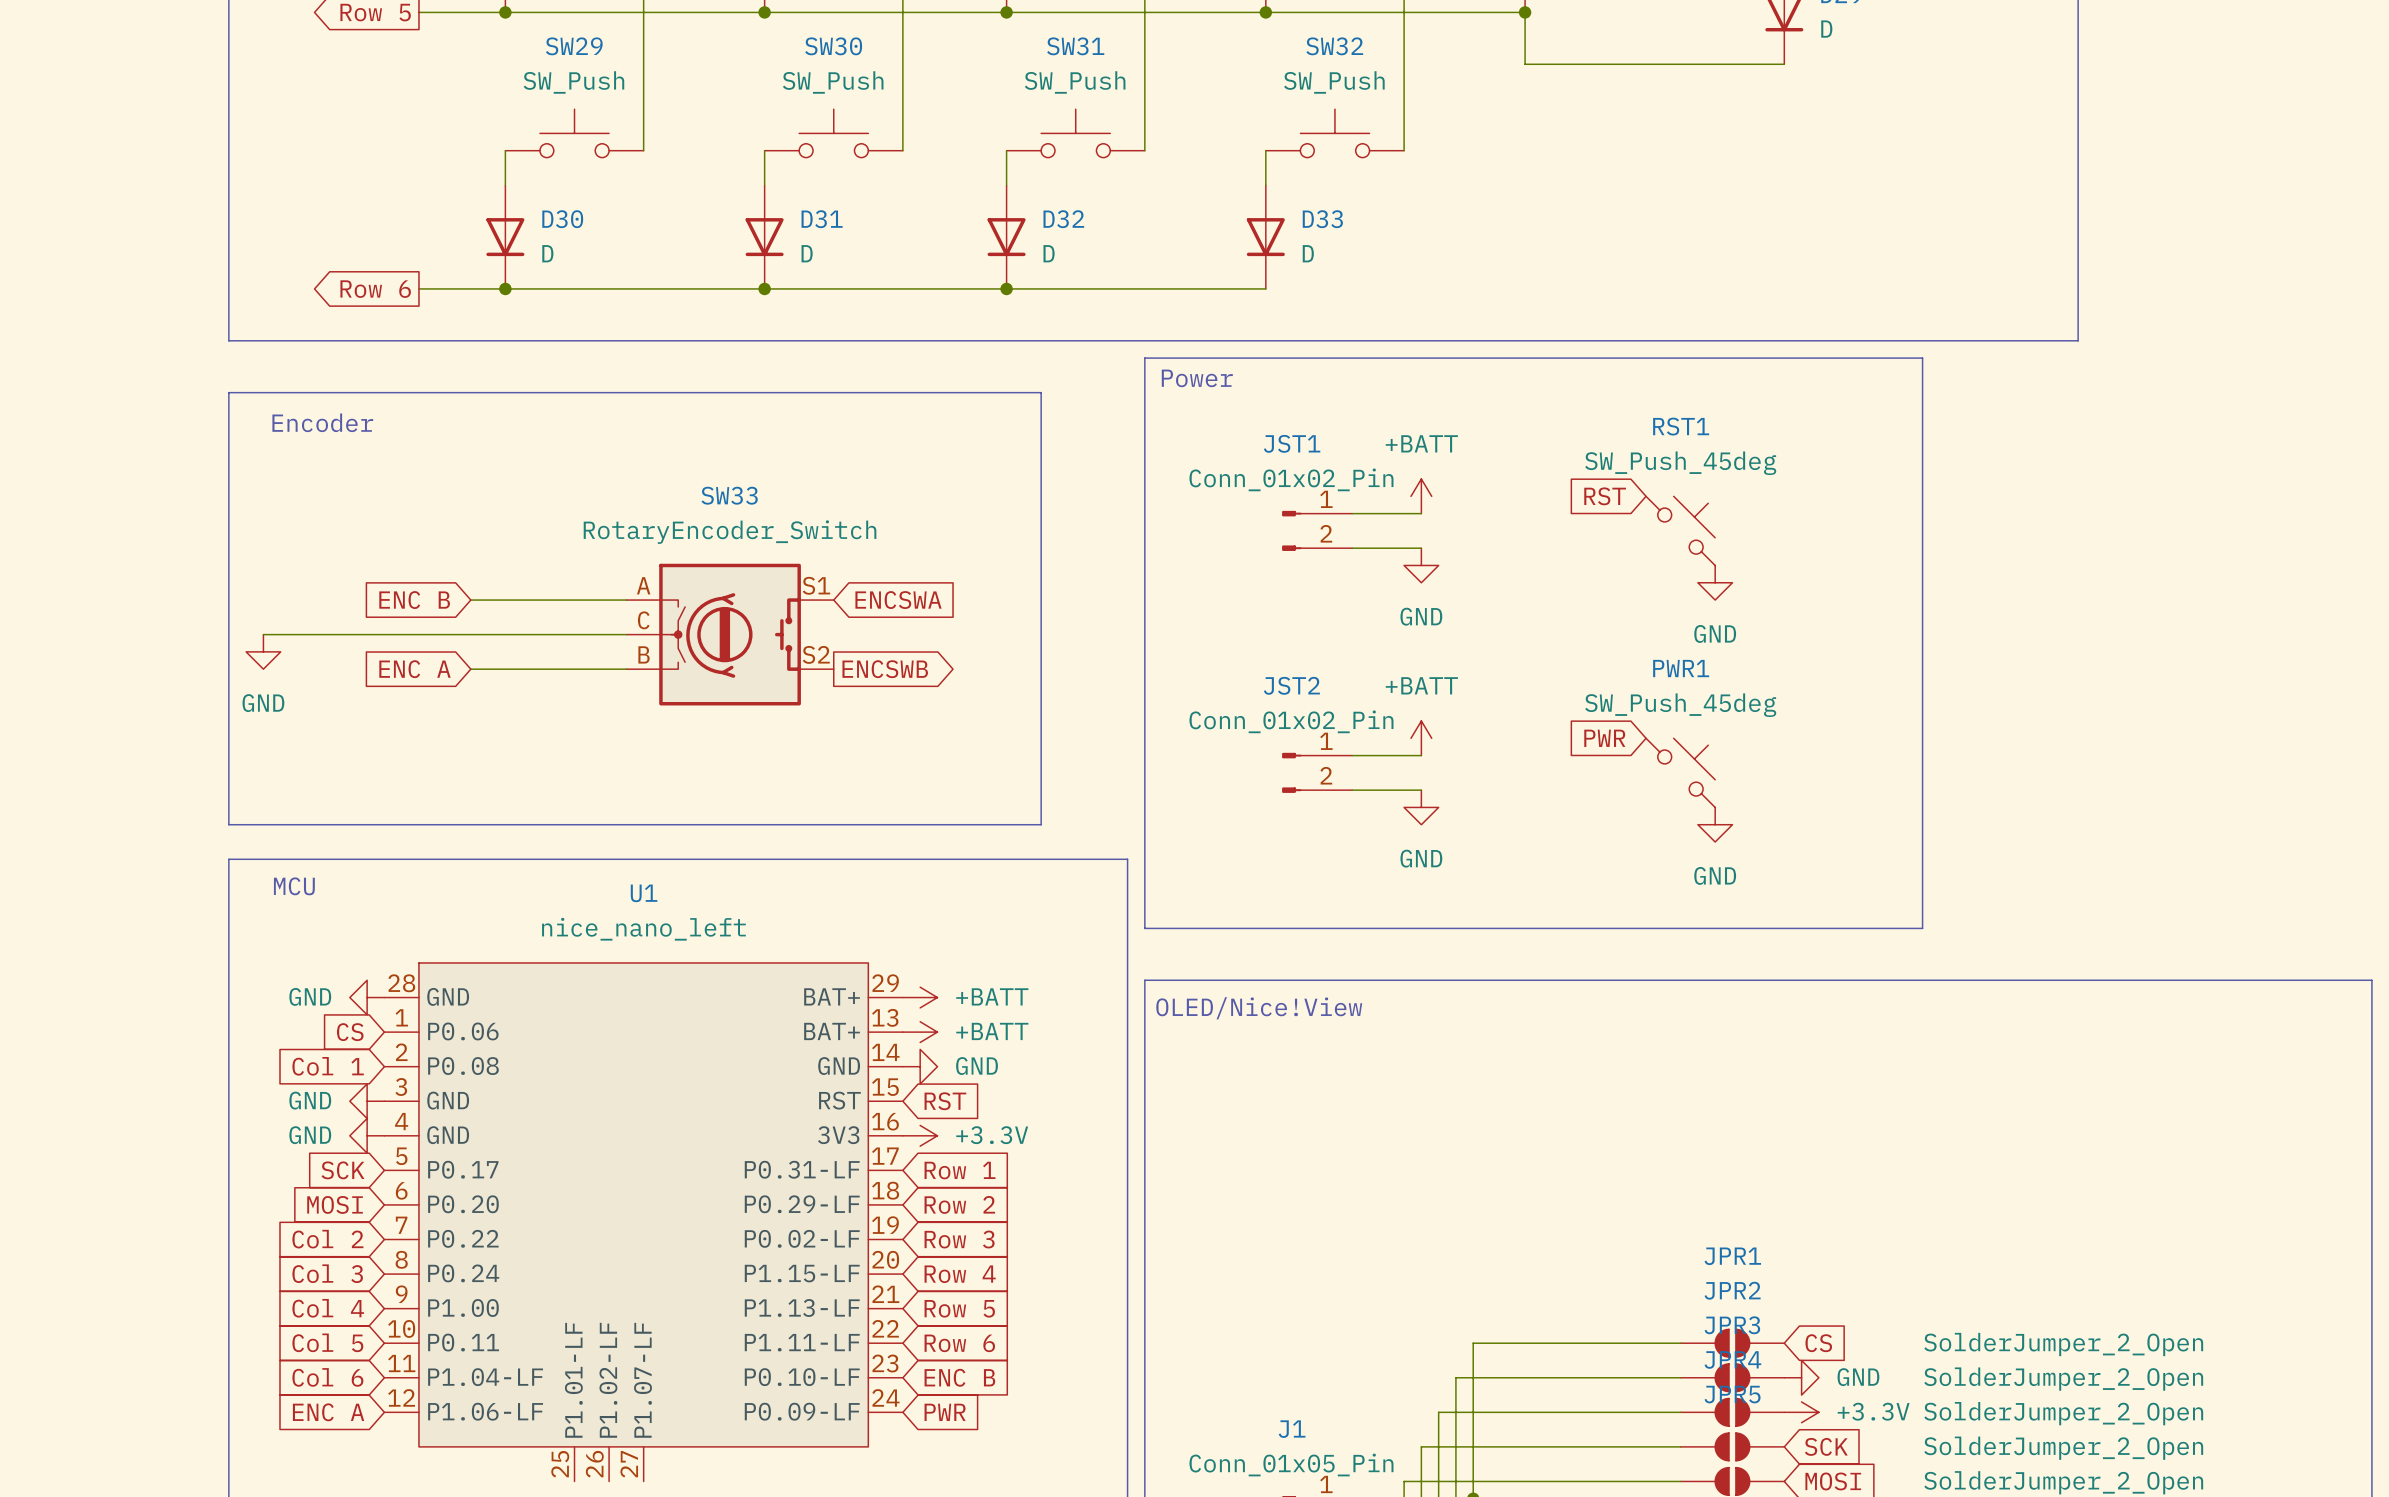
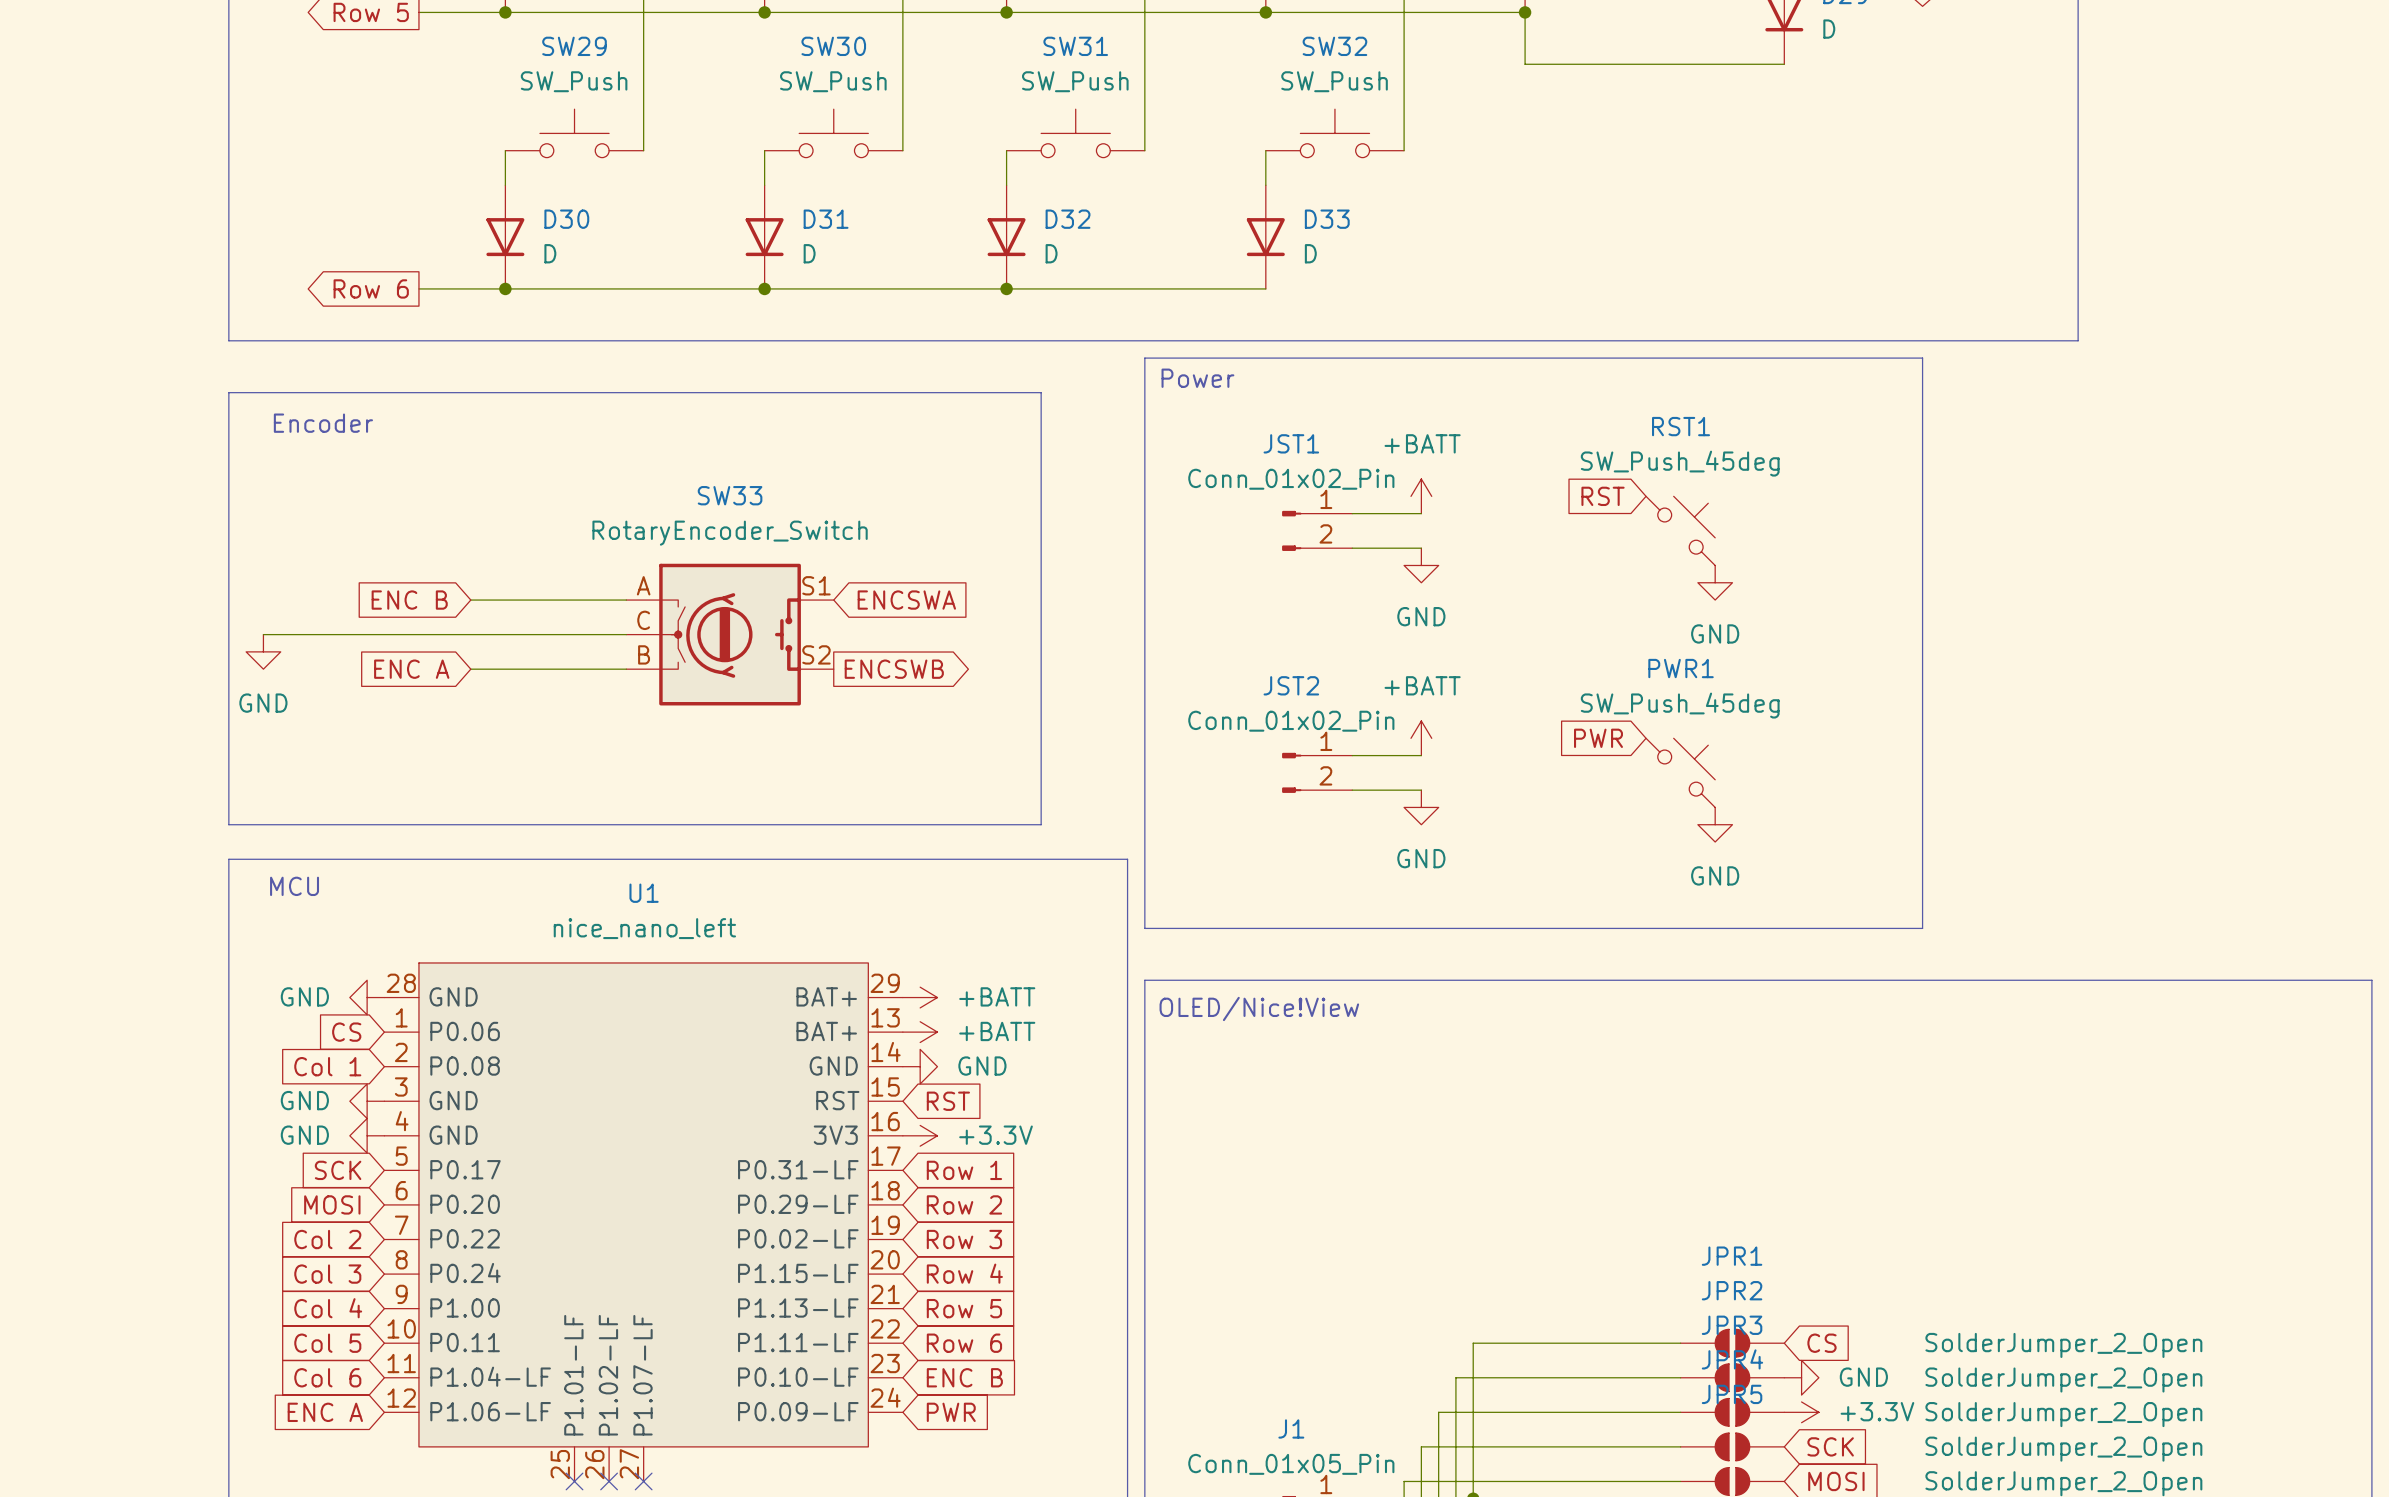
no-connect mark: none -> (574, 1481)
no-connect mark: none -> (609, 1481)
no-connect mark: none -> (643, 1481)

